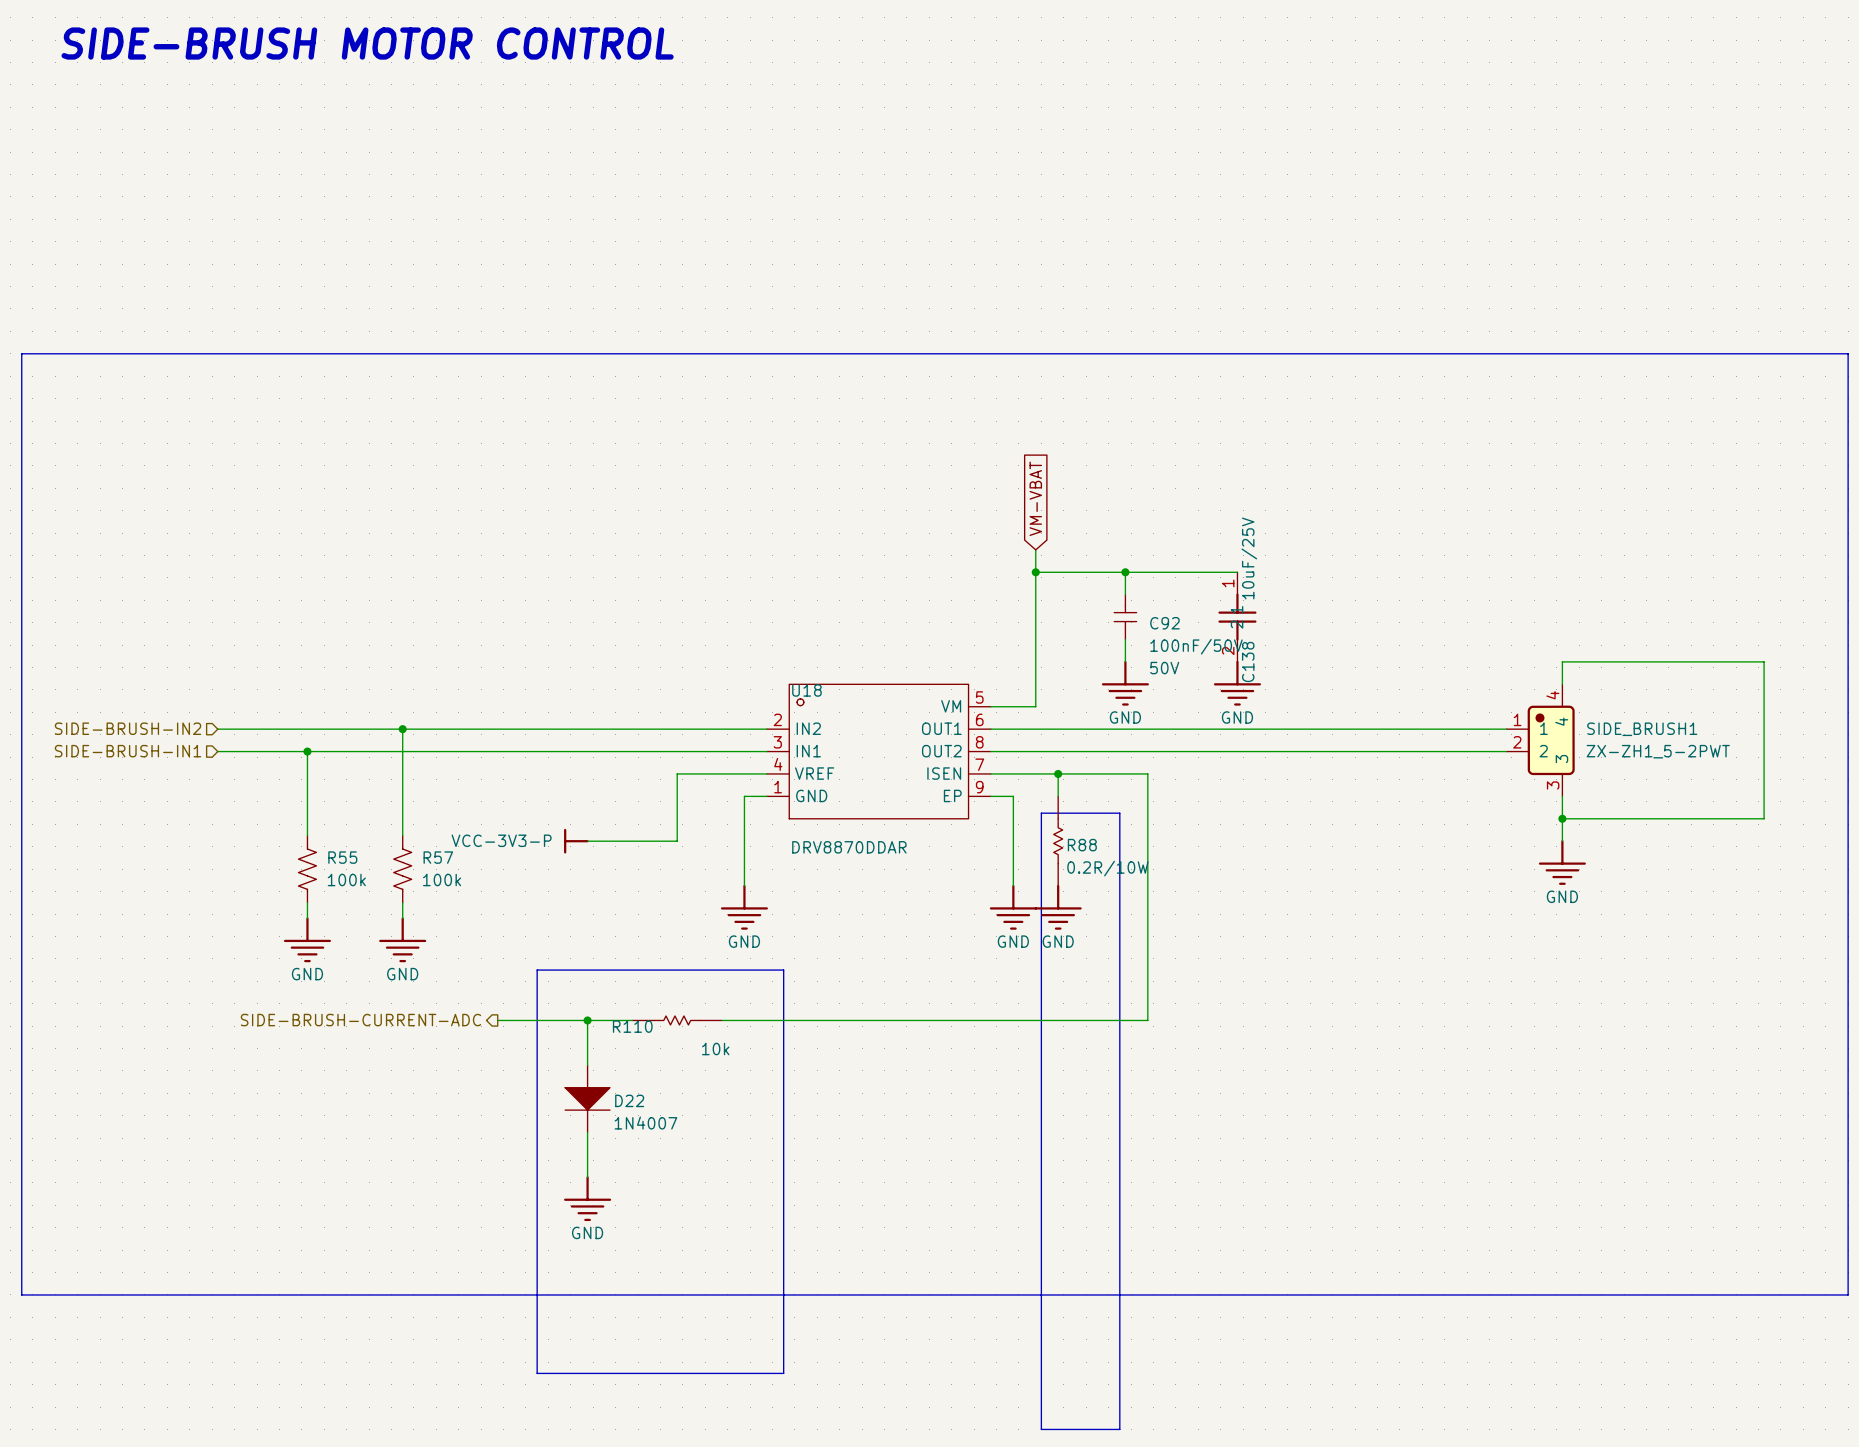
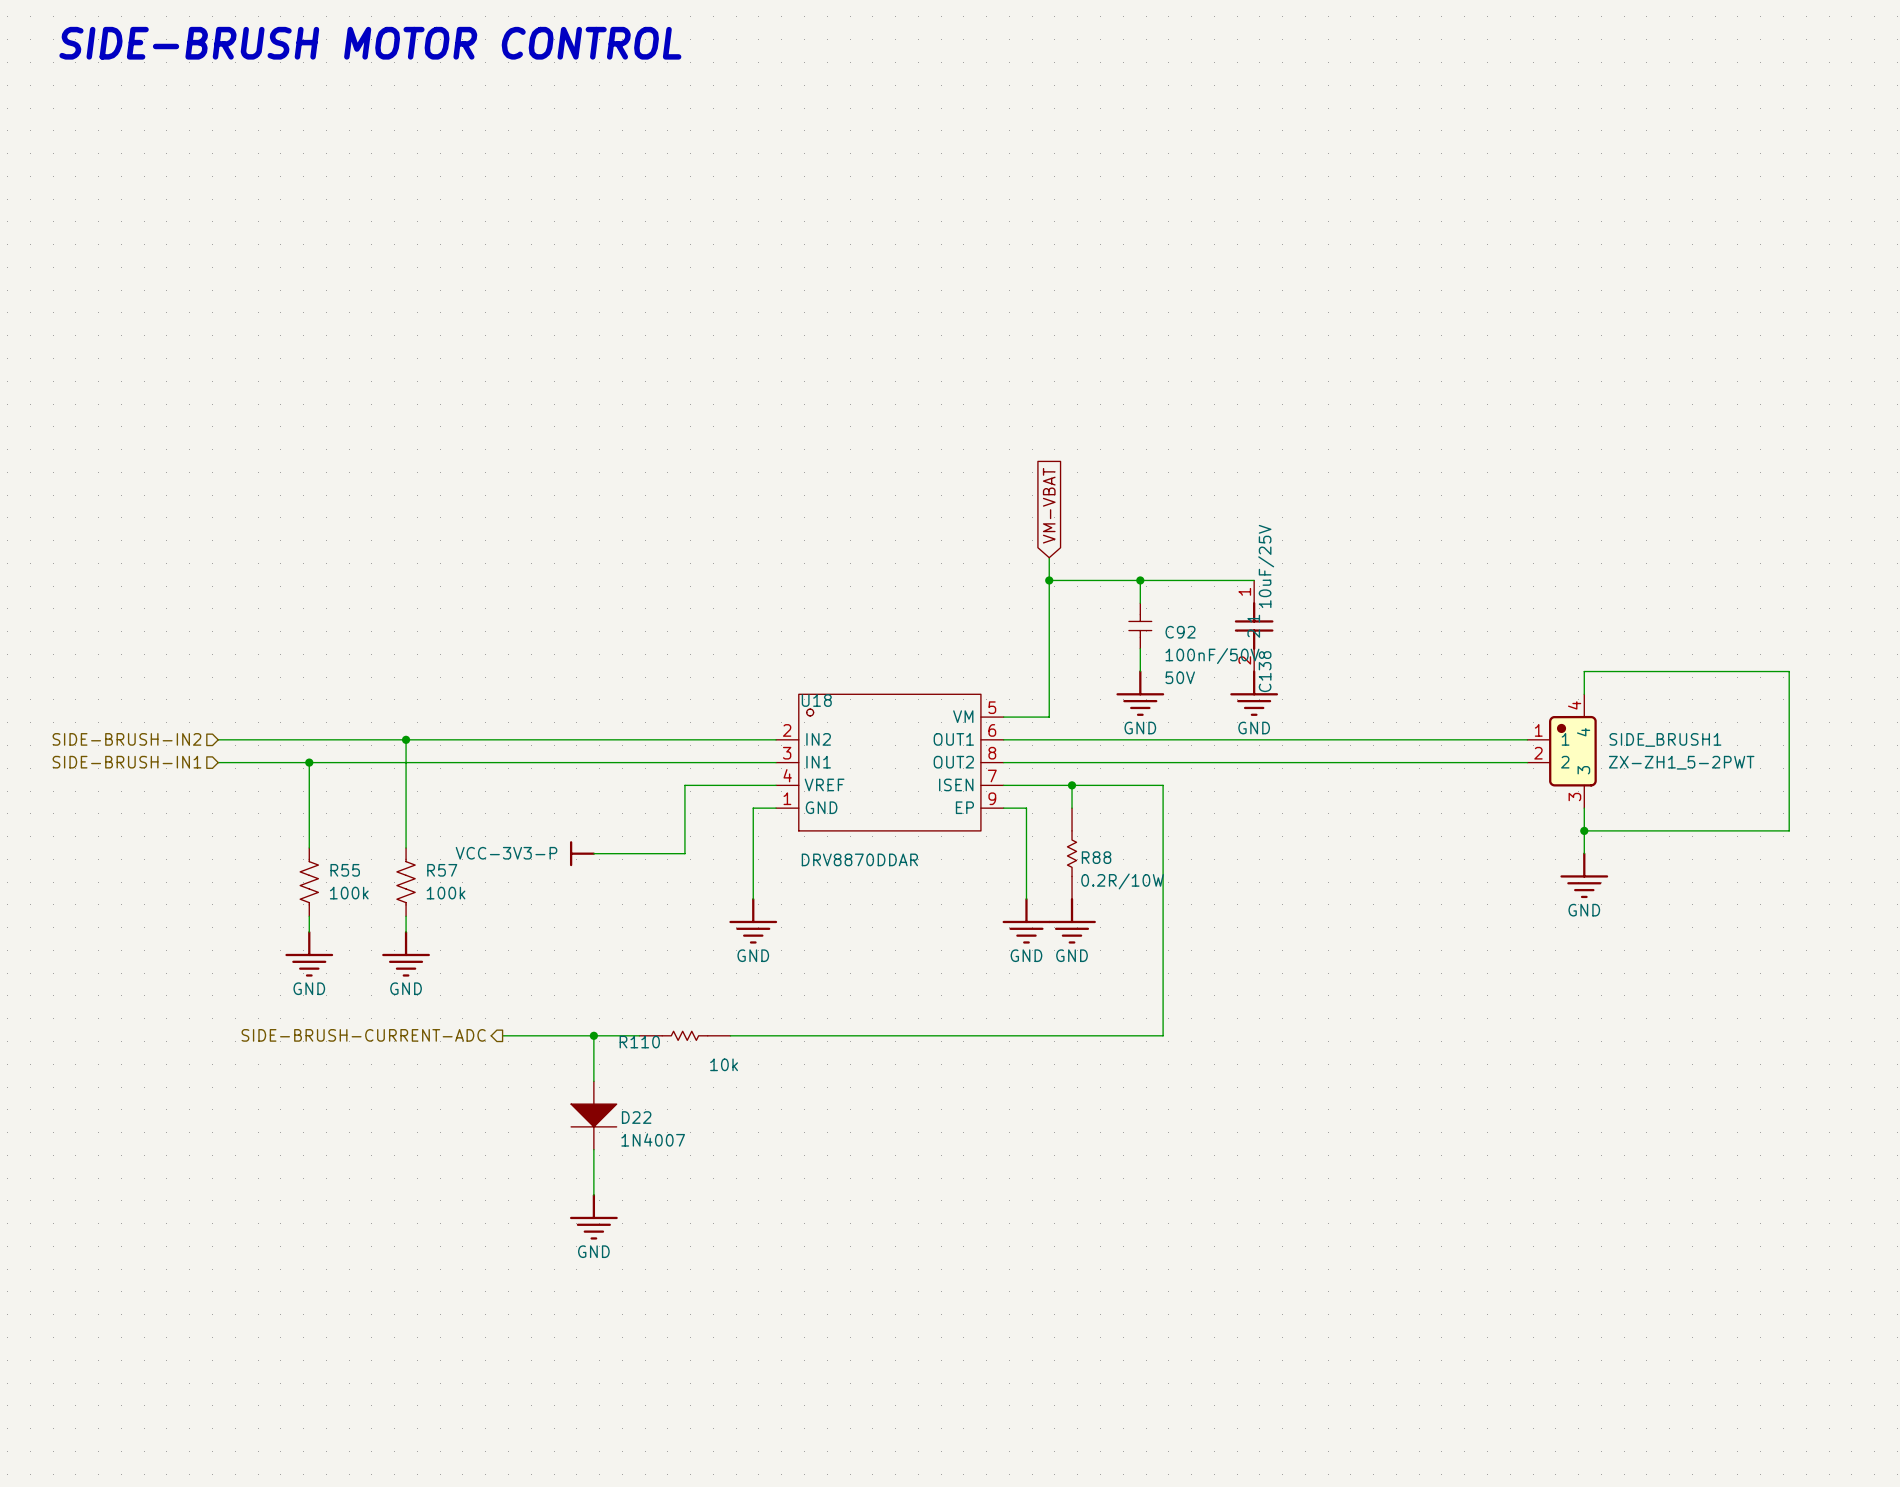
line: (21, 353) (1848, 353) (1848, 1294) (21, 1294) (21, 353) -> none
line: (1041, 813) (1119, 813) (1119, 1429) (1041, 1429) (1041, 813) -> none
line: (537, 970) (783, 970) (783, 1373) (537, 1373) (537, 970) -> none

